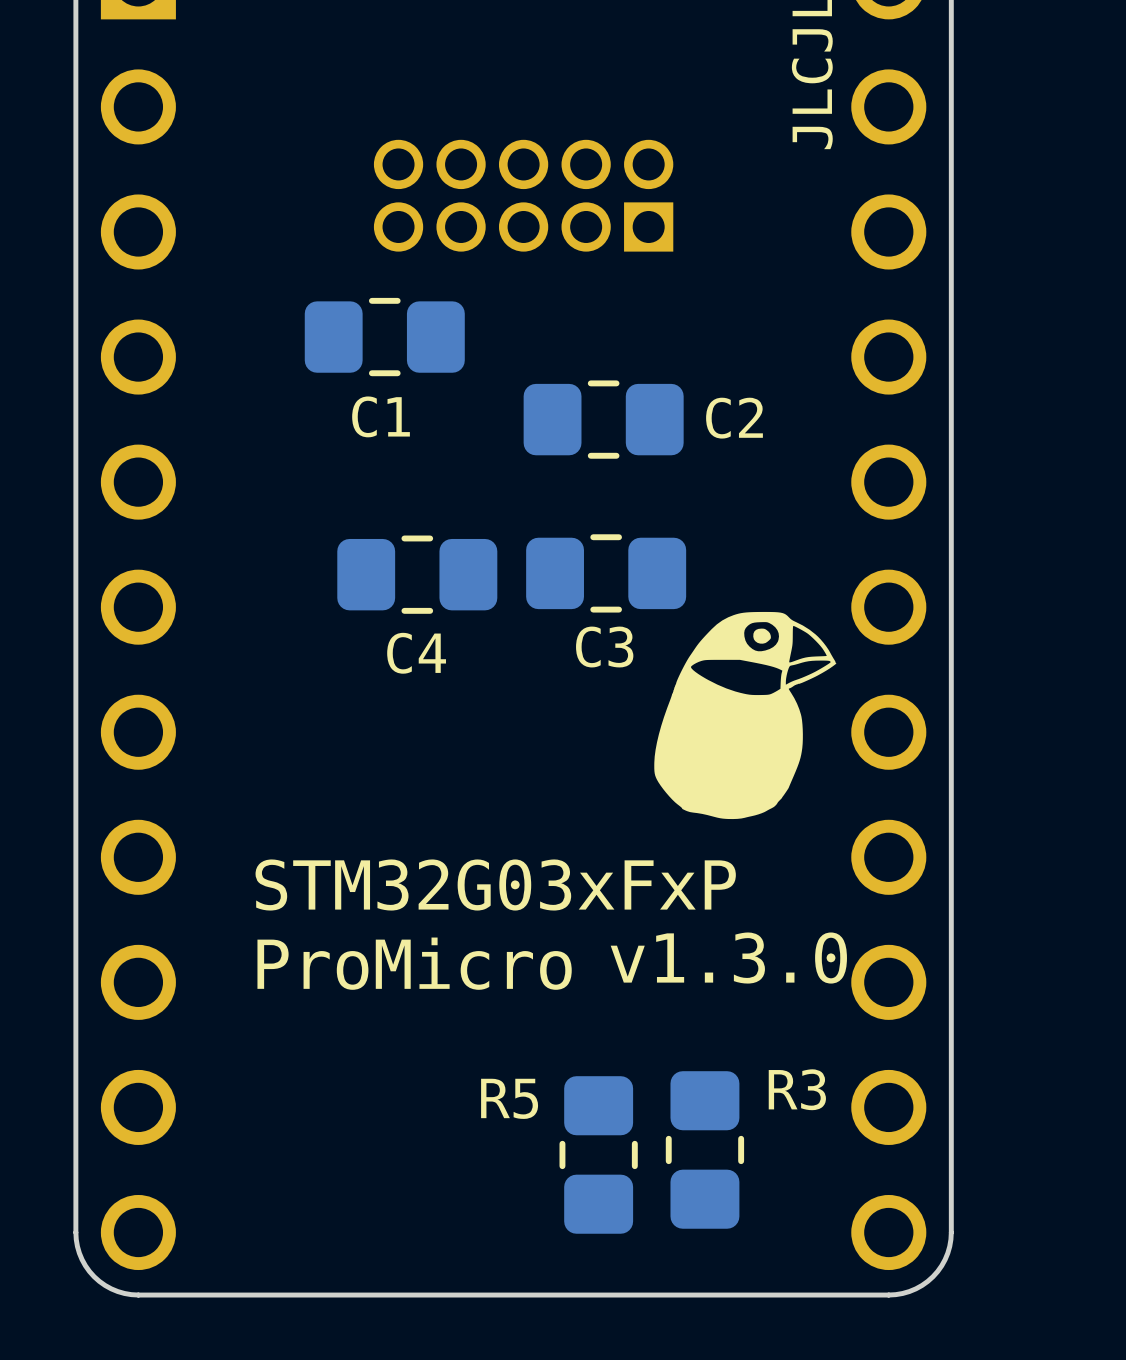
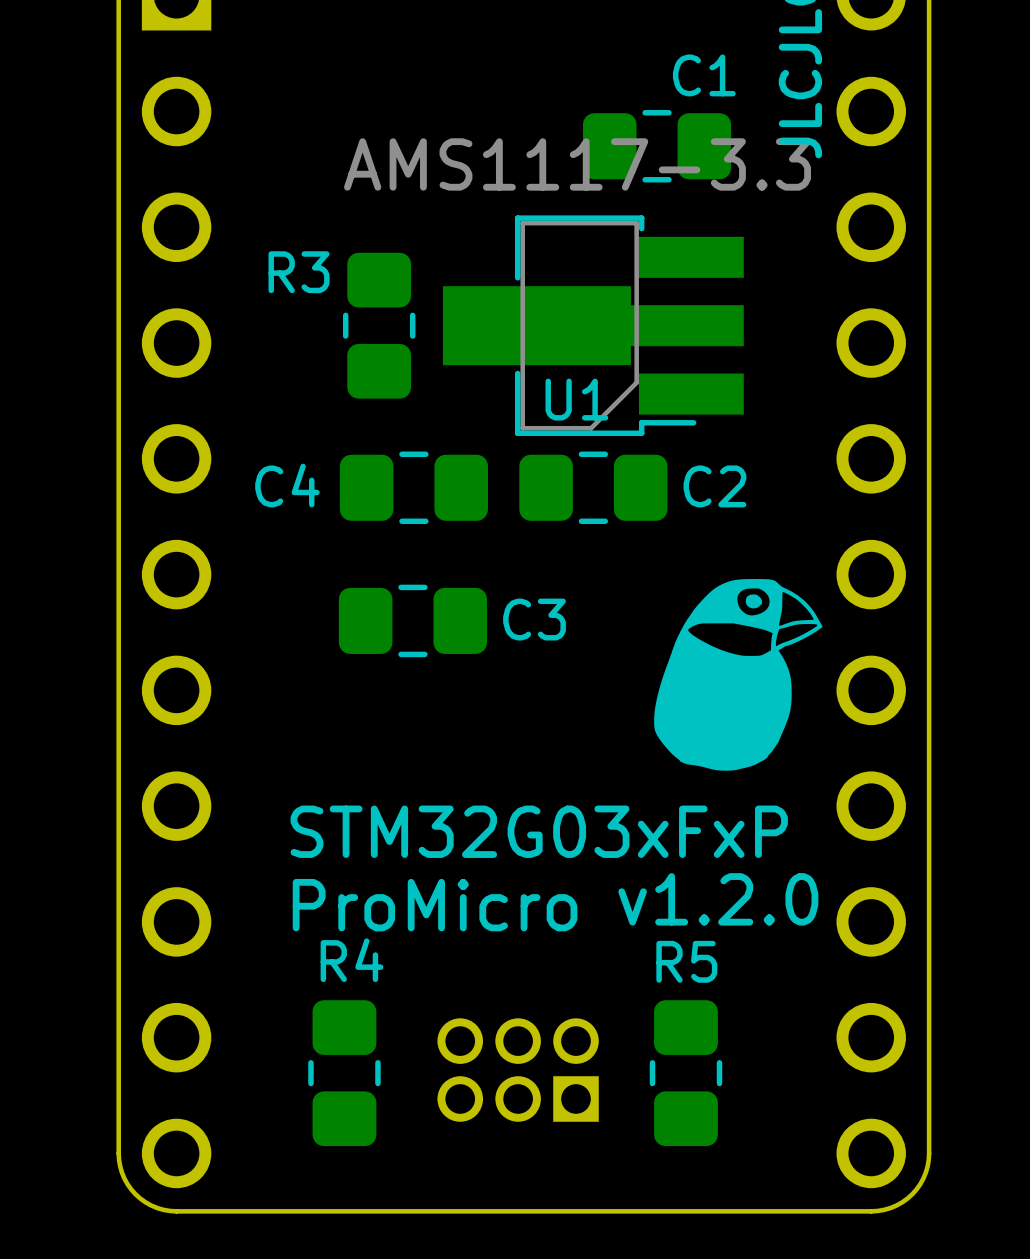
part: (523, 195) -> none
C1 position: (384, 337) -> (657, 146)
U1: none -> AMS1117-3.3 (593, 325)
C1 name position: C1 (381, 416) -> C1 (704, 75)
C2 position: (603, 419) -> (593, 487)
C3 position: (606, 573) -> (412, 620)
C4 position: (417, 574) -> (413, 487)
C3 name position: C3 (604, 647) -> C3 (534, 619)
C4 name position: C4 (416, 653) -> C4 (287, 485)
text: v1.3.0 (728, 958) -> v1.2.0 (718, 899)
R3 name position: R3 (797, 1089) -> R3 (299, 272)
R5 name position: R5 (509, 1098) -> R5 (686, 961)
part: none -> (518, 1070)
R4: none -> (344, 1073)
R3 position: (704, 1149) -> (379, 325)
R5 position: (598, 1154) -> (685, 1073)

